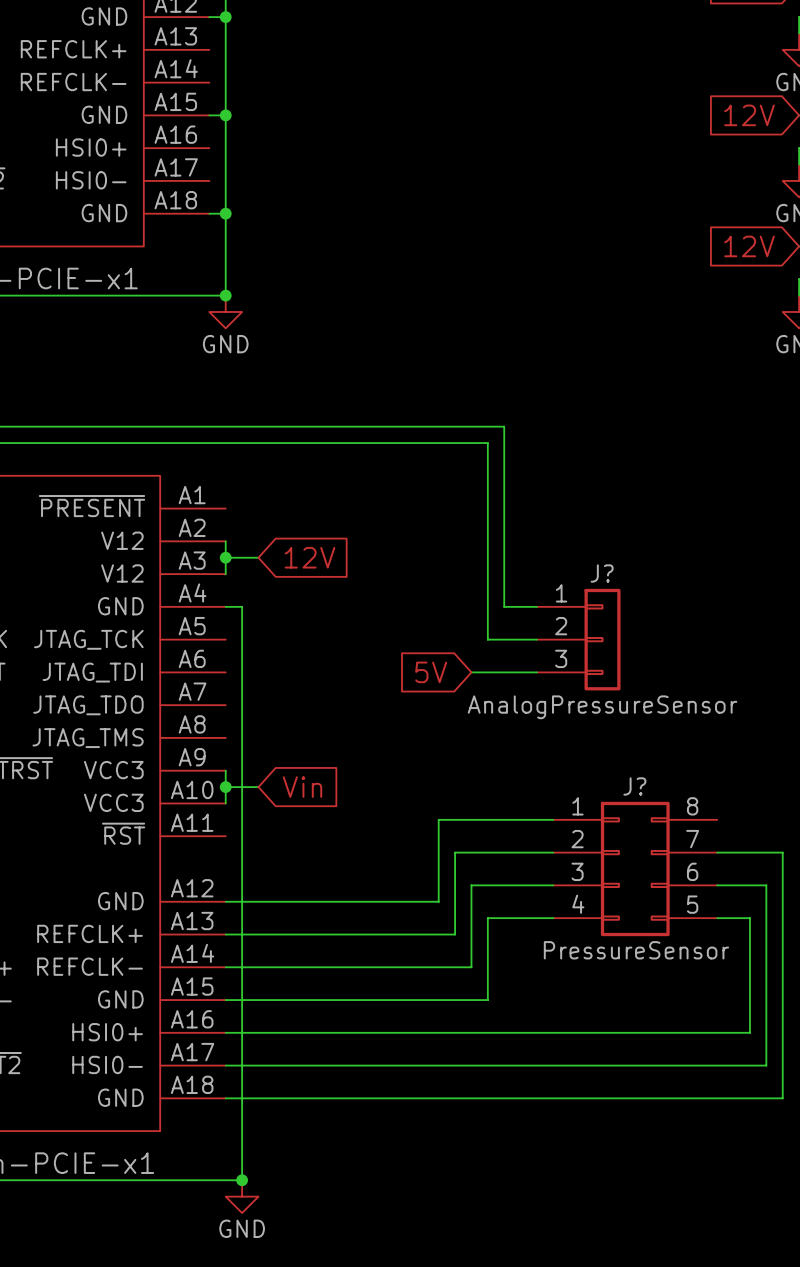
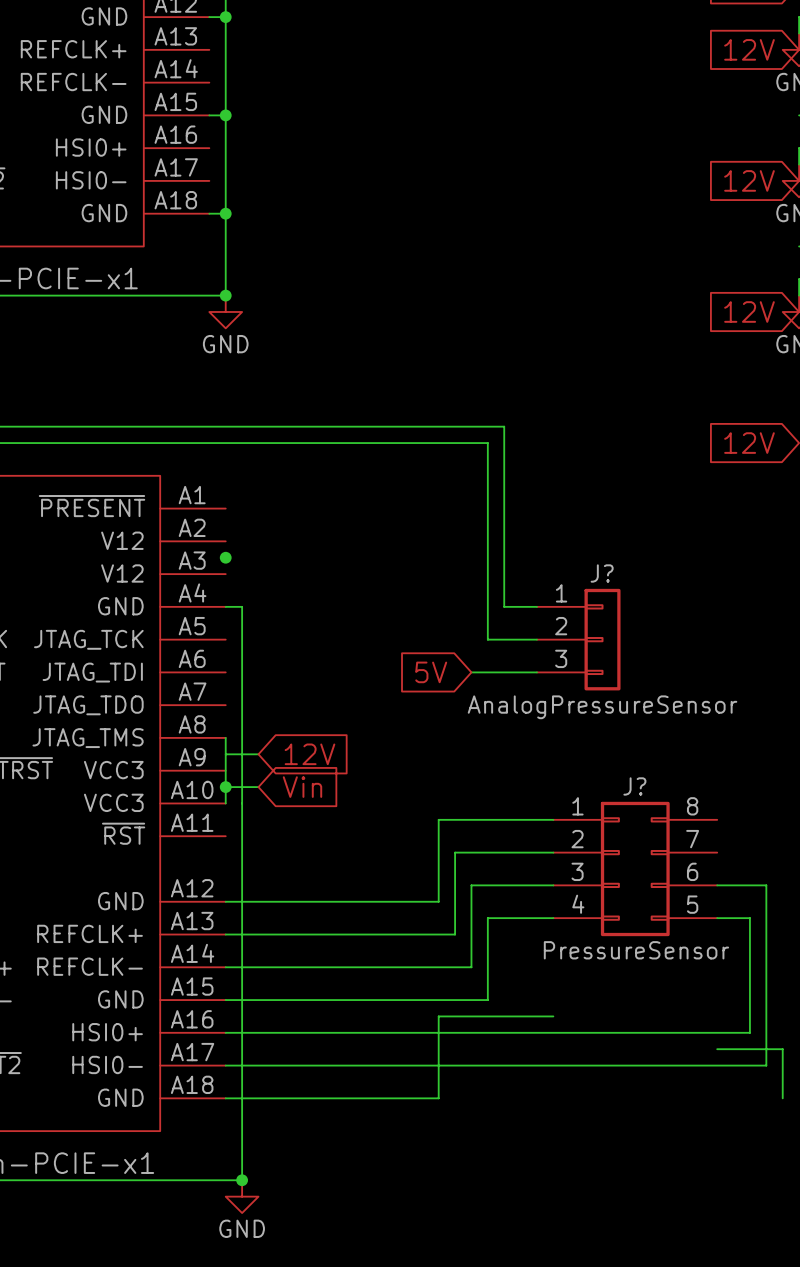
global label: none -> 12V (749, 49)
global label: 12V (749, 115) -> none
global label: none -> 12V (749, 180)
global label: 12V (749, 246) -> none
global label: none -> 12V (749, 311)
global label: none -> 12V (749, 443)
wire: (225, 541) (225, 574) -> (225, 737) (225, 770)
wire: (225, 557) (258, 557) -> (225, 754) (258, 754)
global label position: 12V (309, 557) -> 12V (309, 754)
wire: (717, 852) (782, 852) (782, 1049) -> (717, 1049) (782, 1049)
wire: (438, 1098) (782, 1098) -> (438, 1098) (438, 1016) (553, 1016)

